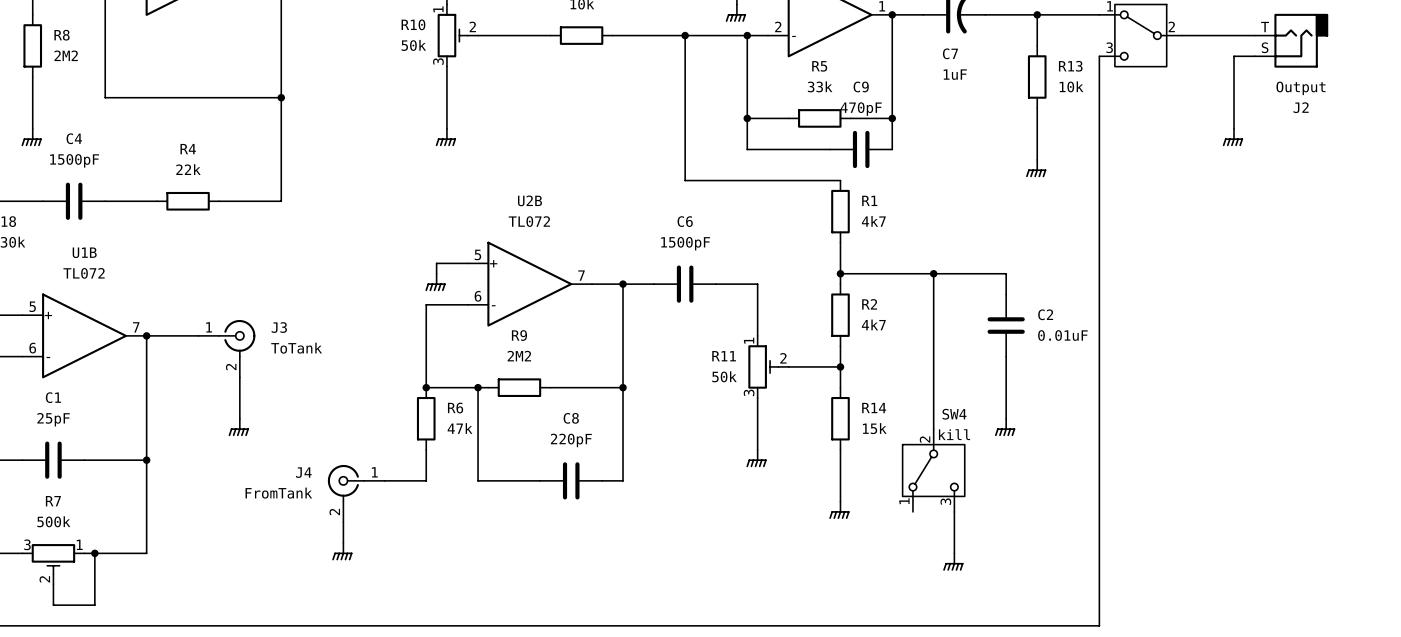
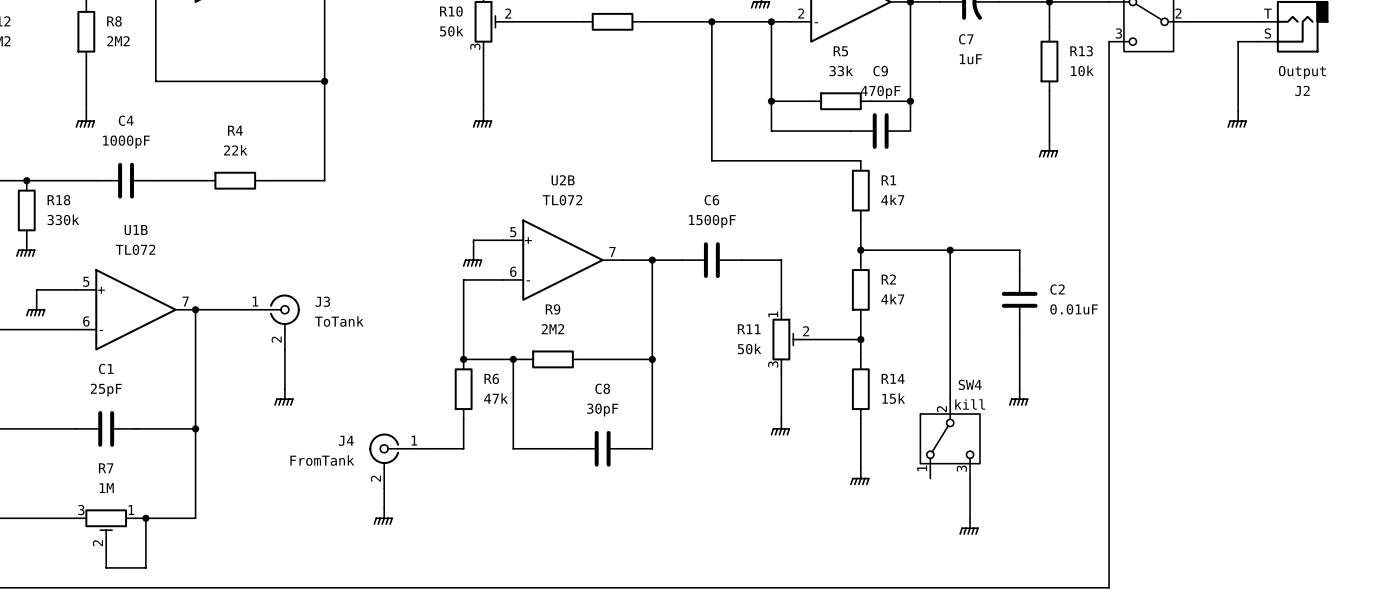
C4 value: 1500pF (74, 160) -> 1000pF (126, 141)
C8 value: 220pF (571, 440) -> 30pF (602, 410)
R7 value: 500k (53, 521) -> 1M (106, 488)

